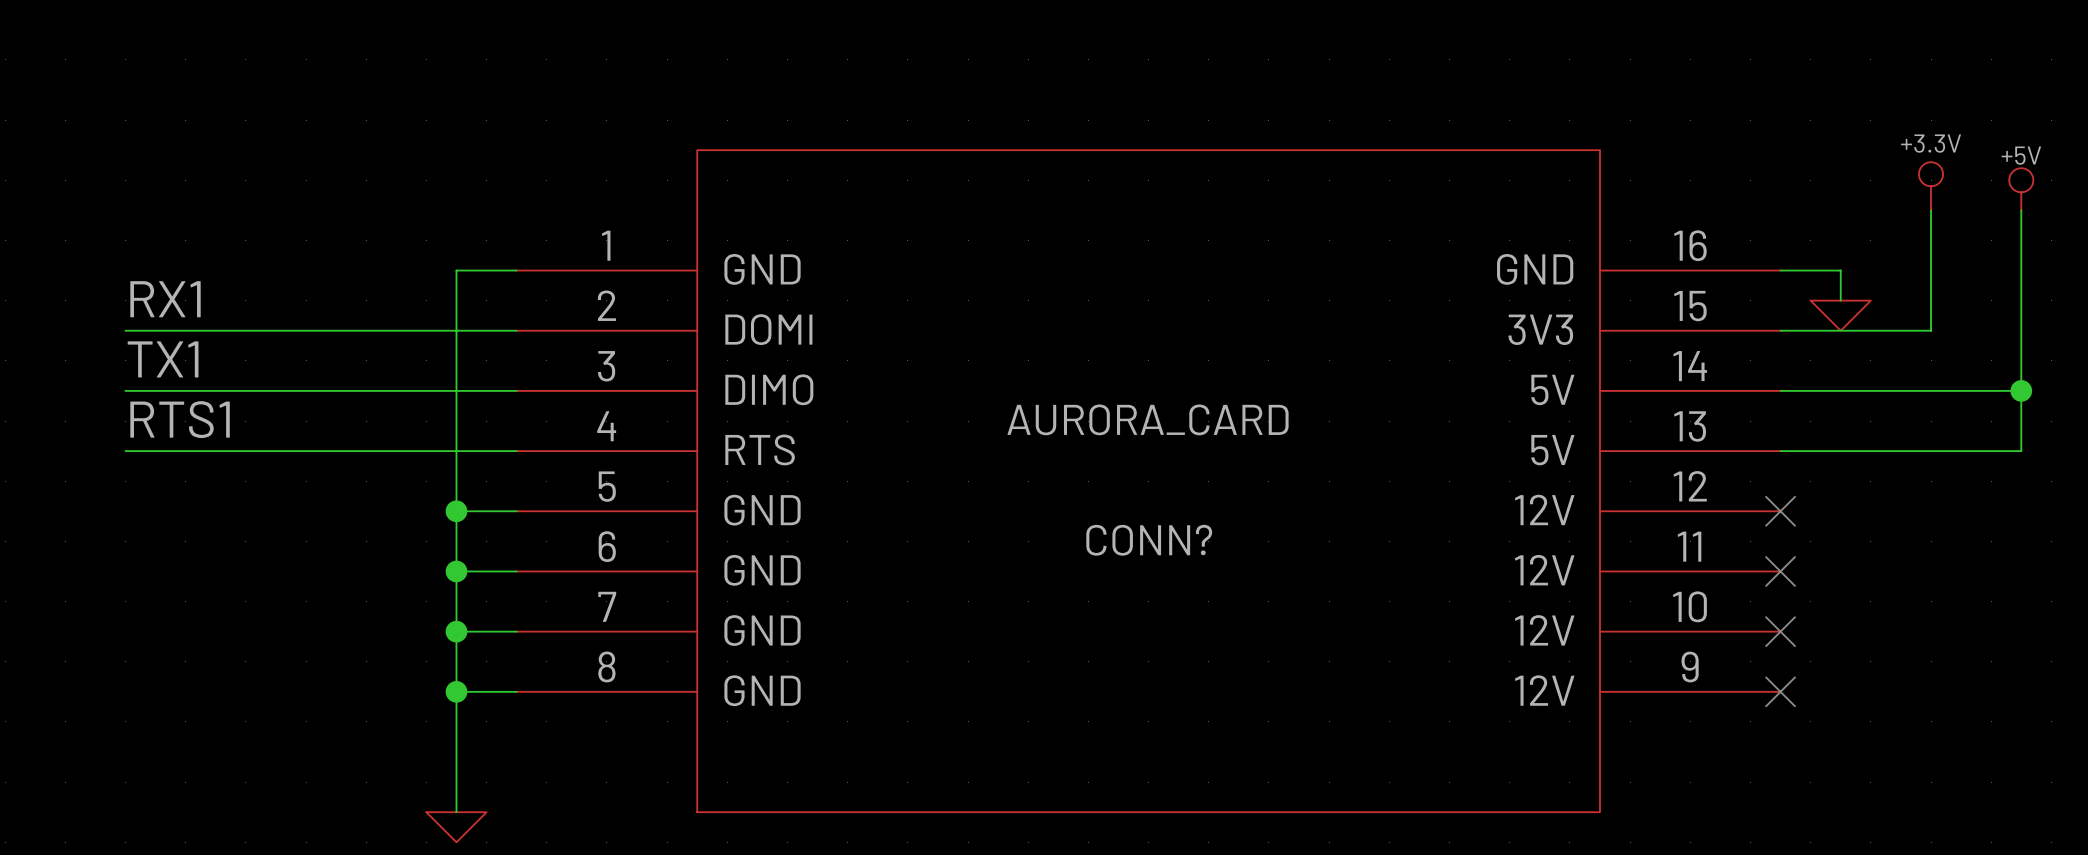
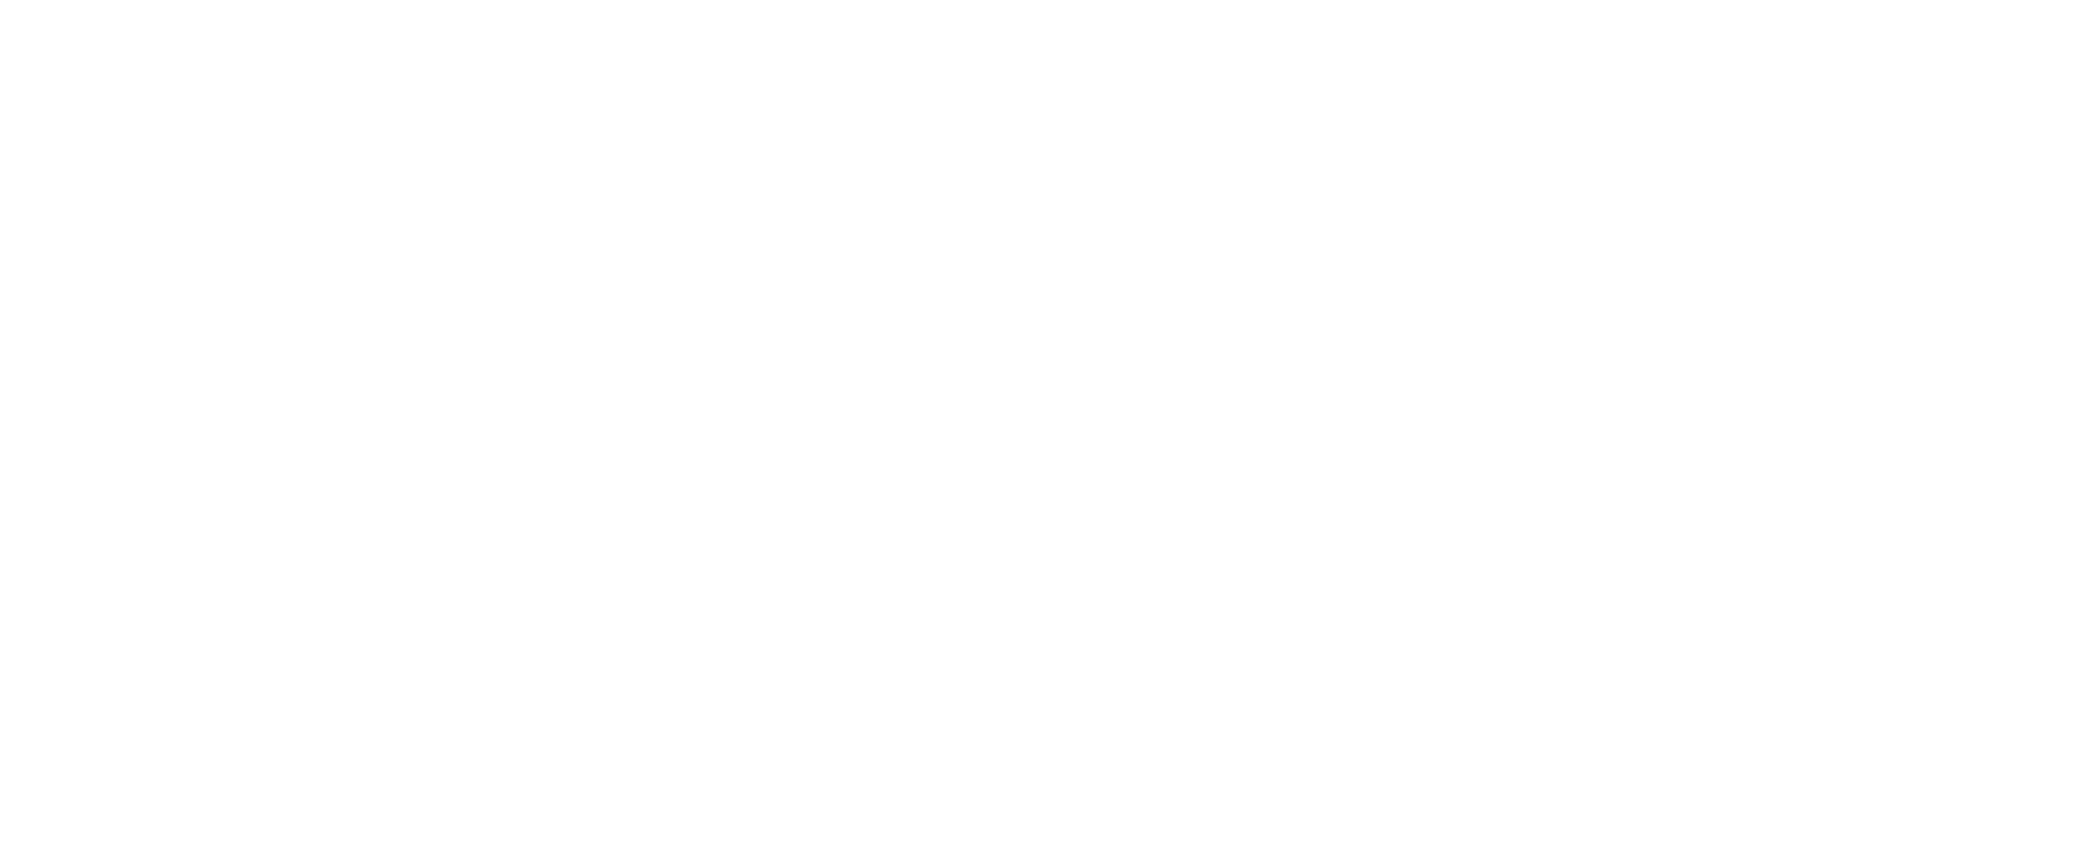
power symbol: +3.3V (1931, 186) -> none
power symbol: +5V (2021, 189) -> none
wire: (1931, 210) (1931, 330) (1780, 330) -> none
wire: (2021, 210) (2021, 451) (1780, 451) -> none
wire: (516, 270) (456, 270) (456, 812) -> none
wire: (1780, 270) (1840, 270) (1840, 300) -> none
label: RX1 (165, 299) -> none
power symbol: (1840, 315) -> none
wire: (125, 330) (516, 330) -> none
label: TX1 (163, 359) -> none
wire: (125, 390) (516, 390) -> none
wire: (1780, 390) (2021, 390) -> none
junction: (2021, 390) -> none
label: RTS1 (180, 419) -> none
wire: (125, 451) (516, 451) -> none
CONN?: AURORA_CARD (1148, 481) -> none
wire: (456, 511) (516, 511) -> none
junction: (456, 511) -> none
no-connect mark: (1780, 511) -> none
wire: (456, 571) (516, 571) -> none
junction: (456, 571) -> none
no-connect mark: (1780, 571) -> none
wire: (456, 631) (516, 631) -> none
junction: (456, 631) -> none
no-connect mark: (1780, 631) -> none
wire: (456, 691) (516, 691) -> none
junction: (456, 691) -> none
no-connect mark: (1780, 691) -> none
power symbol: (456, 827) -> none

